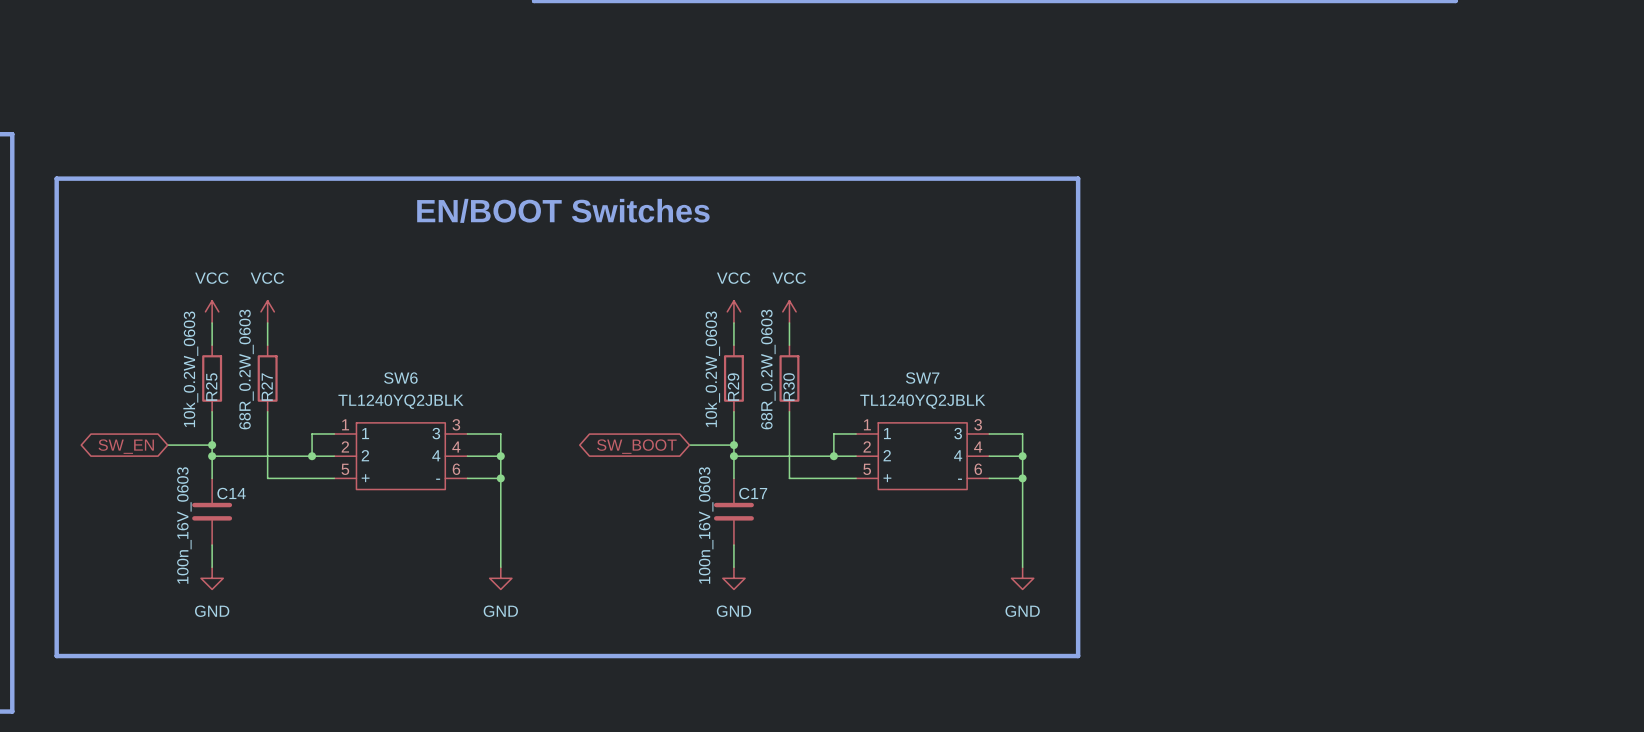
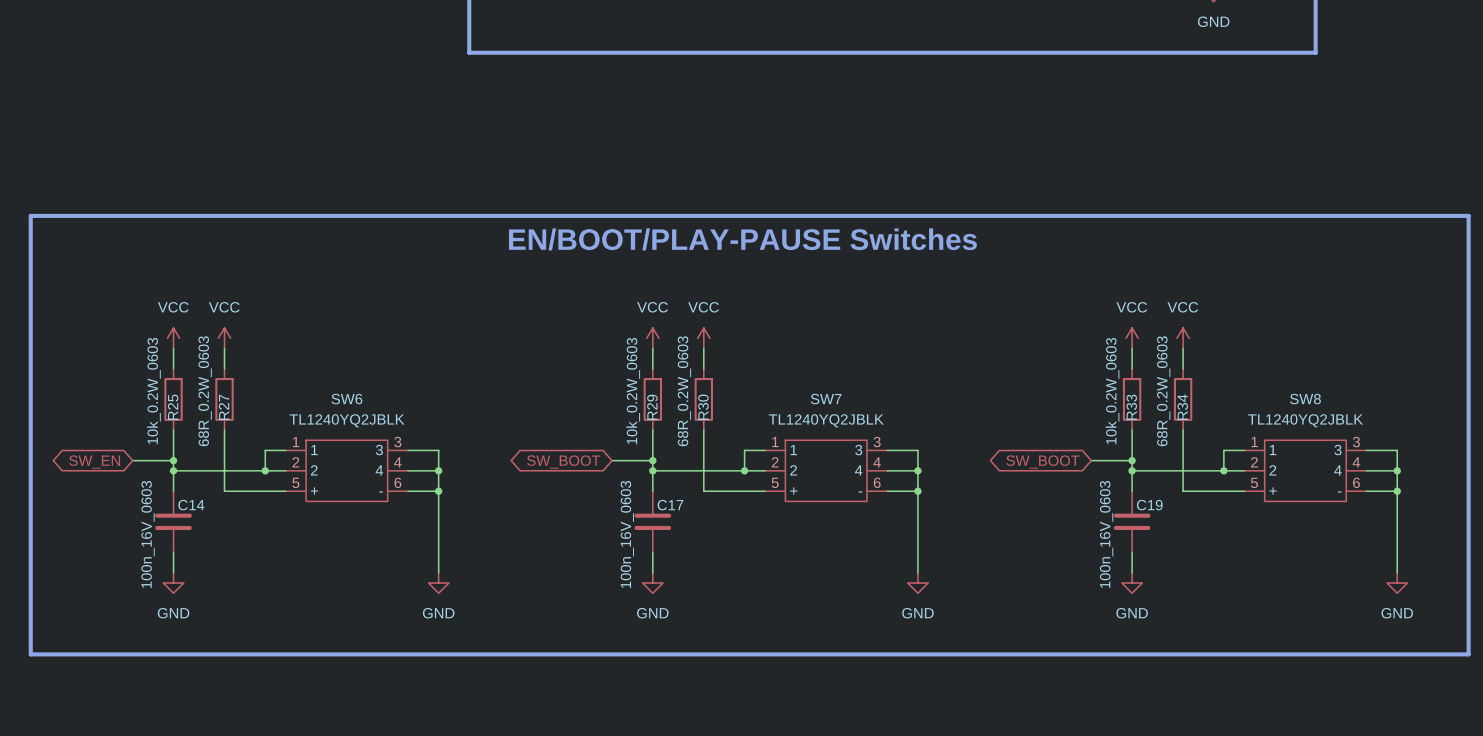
line: (1078, 178) (1078, 656) -> (968, 215) (1468, 215) (1468, 654) (968, 654)
text: none -> EN/BOOT/PLAY-PAUSE Switches (742, 239)
text: EN/BOOT Switches (563, 210) -> none
power symbol: none -> VCC (1132, 338)
power symbol: none -> VCC (1183, 338)
wire: none -> (1132, 348) (1132, 368)
wire: none -> (1183, 348) (1183, 368)
R33: none -> 10k_0.2W_0603 (1132, 399)
R34: none -> 68R_0.2W_0603 (1183, 399)
wire: none -> (1132, 430) (1132, 491)
wire: none -> (1183, 430) (1183, 491) (1244, 491)
wire: none -> (1244, 450) (1223, 450) (1223, 470)
wire: none -> (1366, 450) (1397, 450) (1397, 572)
wire: none -> (1091, 460) (1132, 460)
junction: none -> (1132, 460)
global label: none -> SW_BOOT (1042, 462)
wire: none -> (1132, 470) (1244, 470)
junction: none -> (1132, 470)
junction: none -> (1223, 470)
SW8: none -> TL1240YQ2JBLK (1305, 470)
wire: none -> (1366, 470) (1397, 470)
junction: none -> (1397, 470)
wire: none -> (1366, 491) (1397, 491)
junction: none -> (1397, 491)
C19: none -> 100n_16V_0603 (1132, 521)
wire: none -> (1132, 552) (1132, 572)
power symbol: none -> GND (1132, 583)
power symbol: none -> GND (1397, 583)

